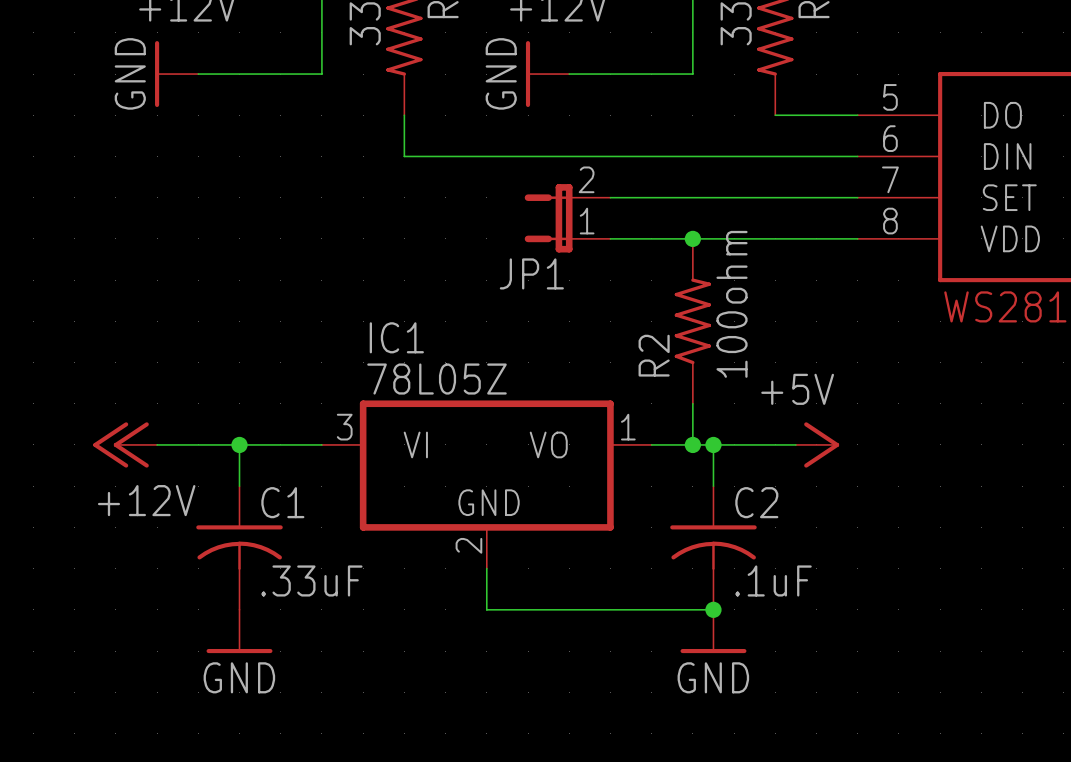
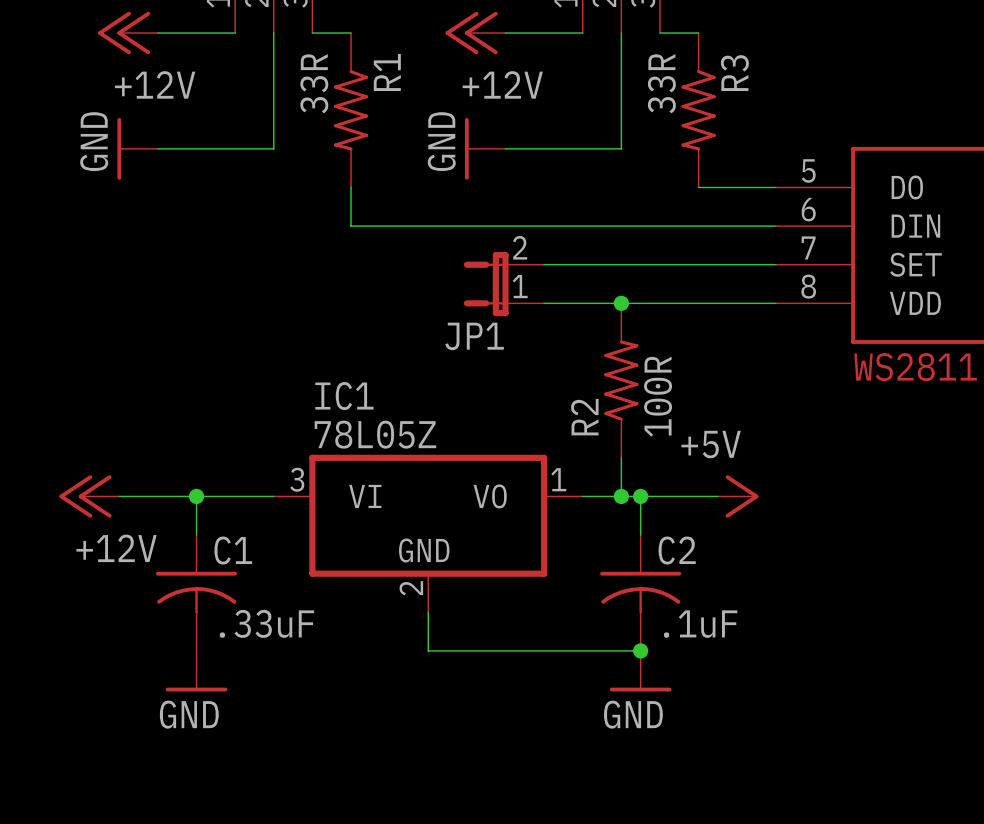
R2 value: 100ohm (732, 304) -> 100R (658, 396)

